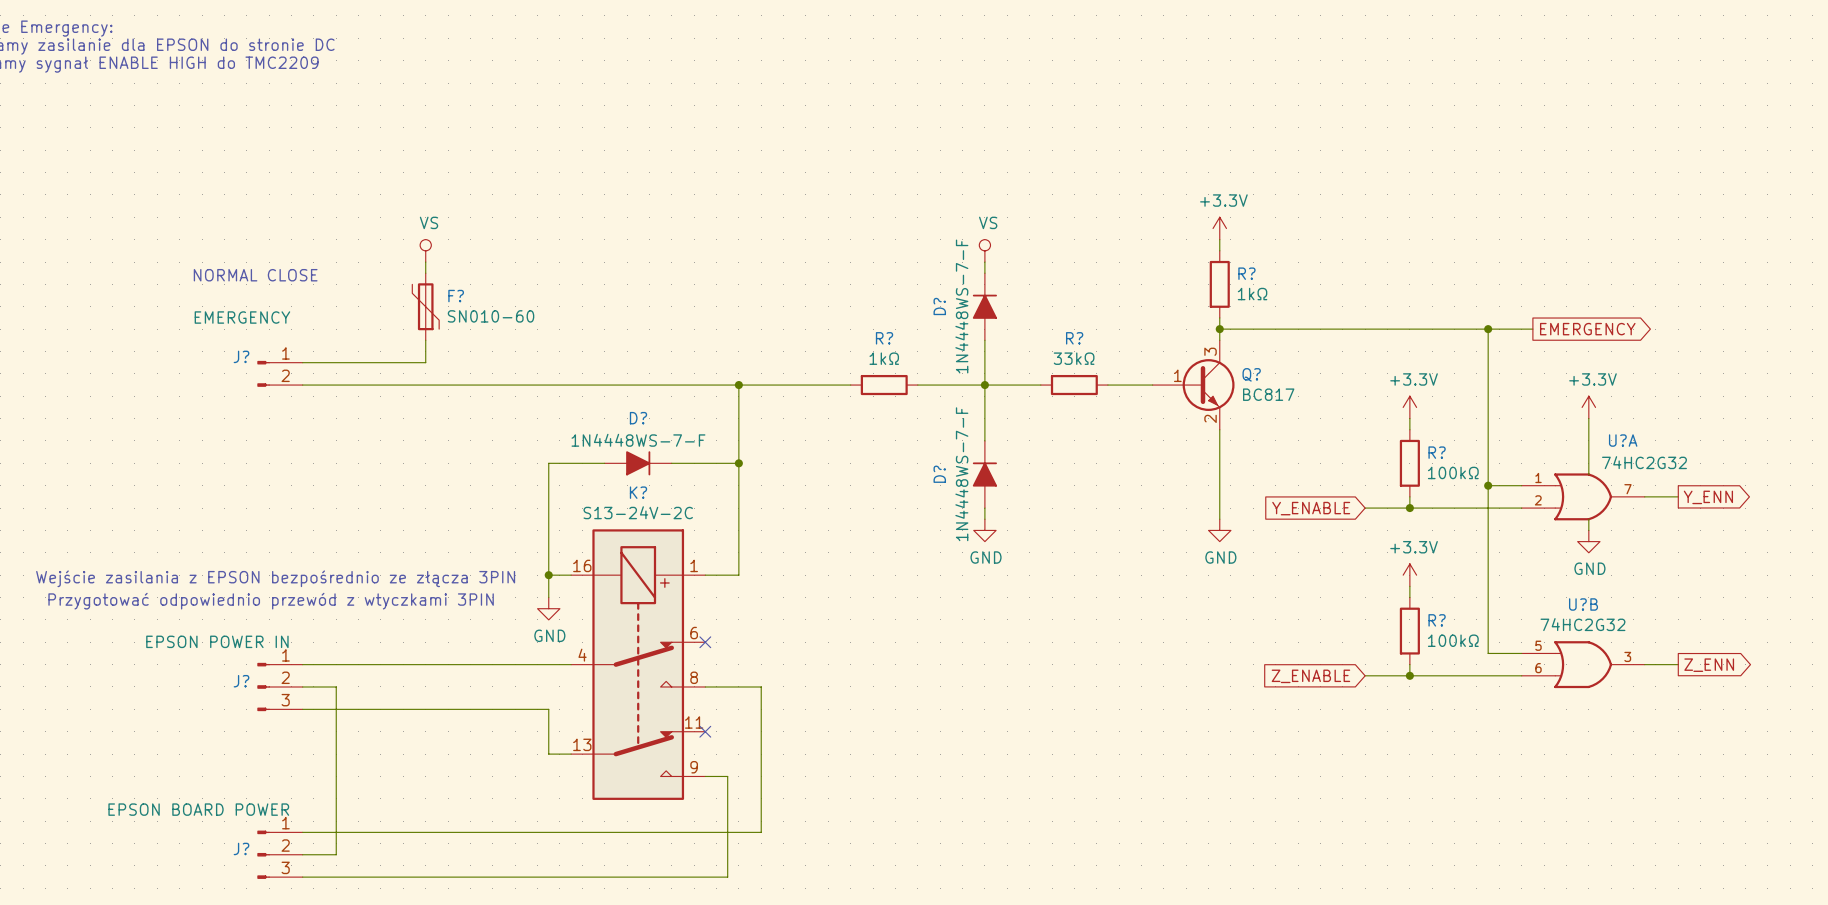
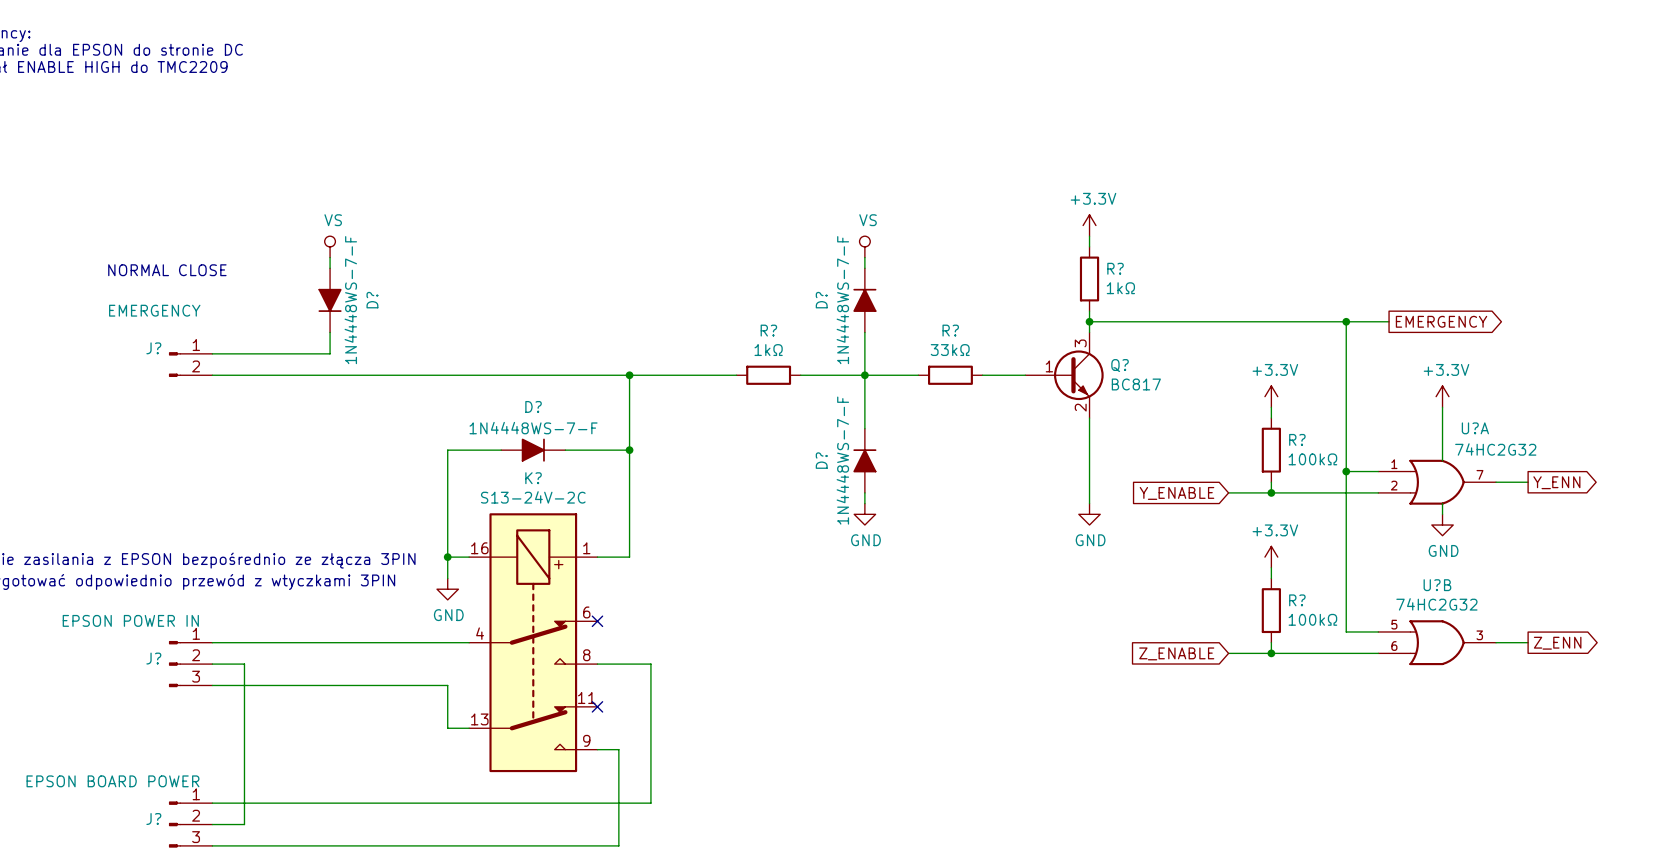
F?: SN010-60 (425, 306) -> none
D?: none -> 1N4448WS-7-F (330, 300)

